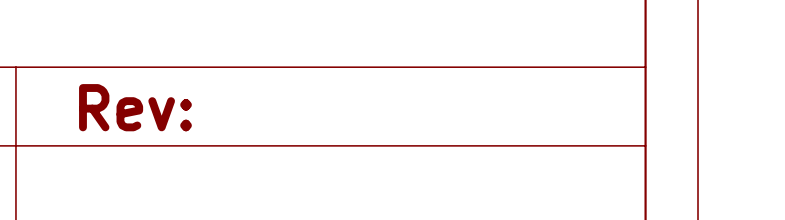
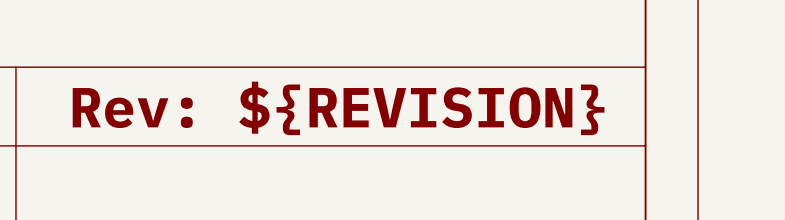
title block: Rev: (135, 107) -> Rev: ${REVISION} (338, 108)

